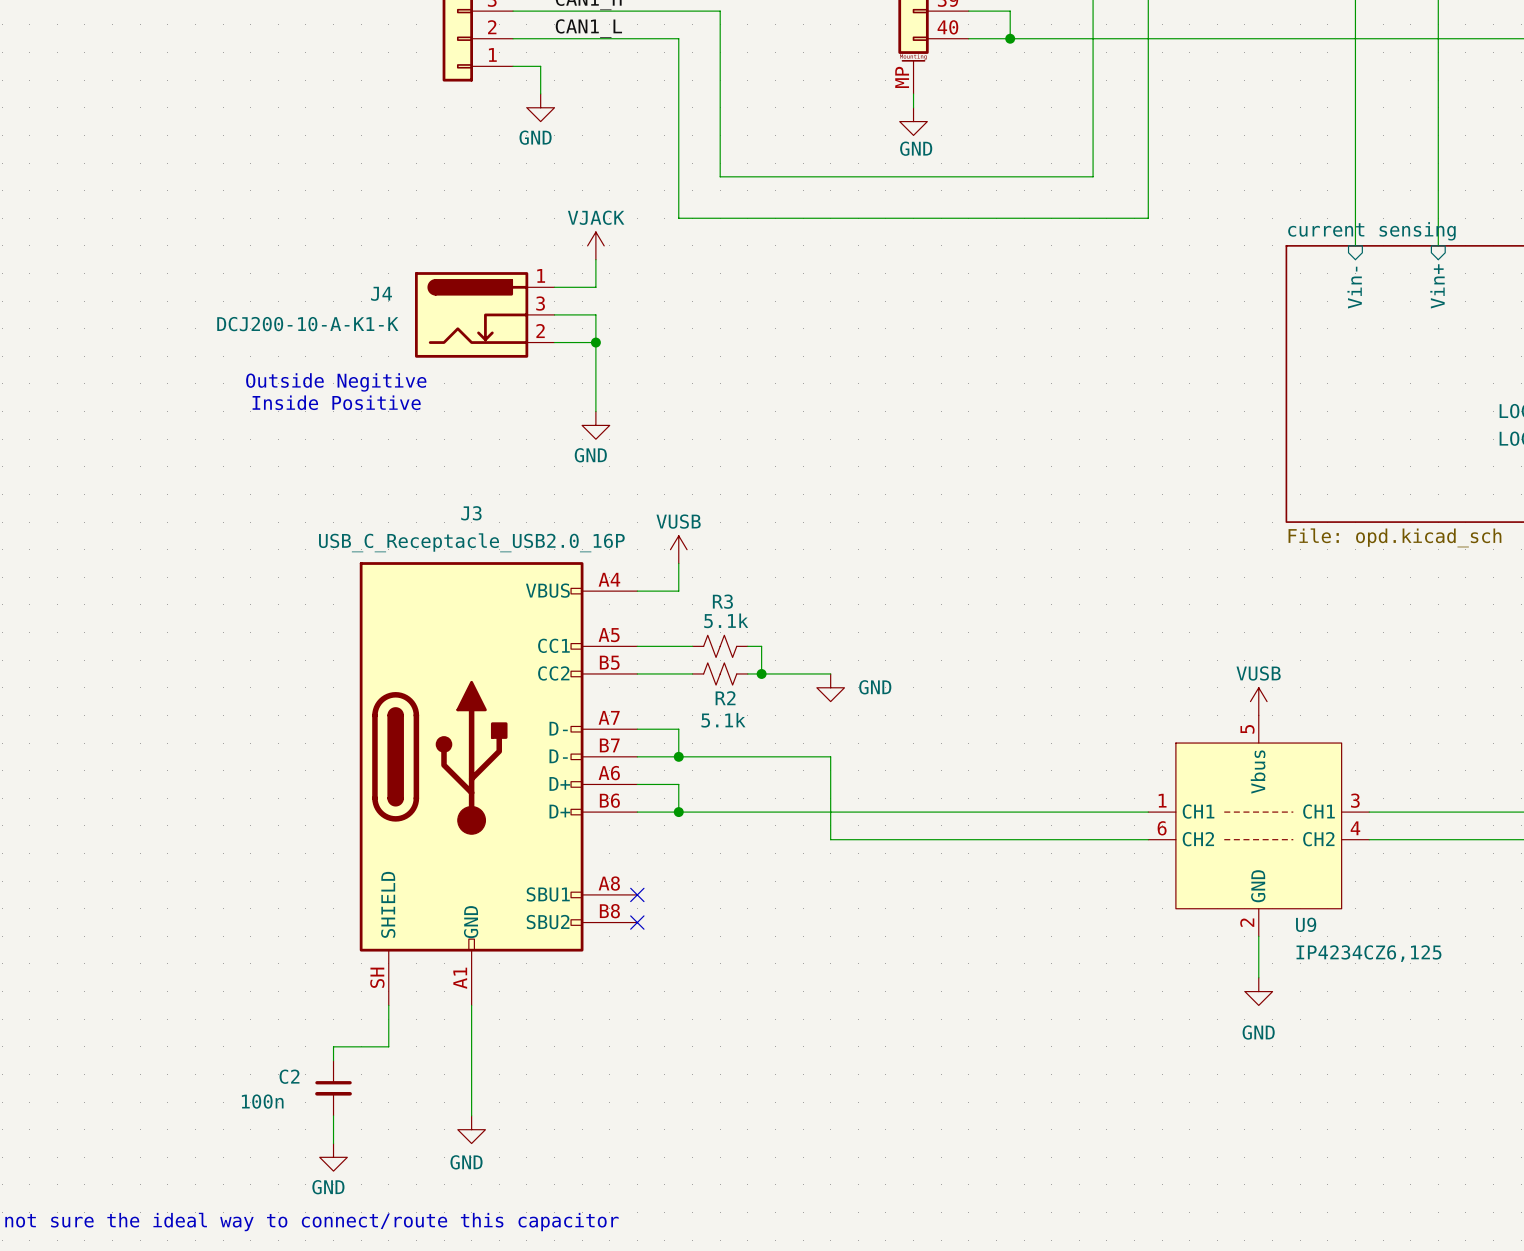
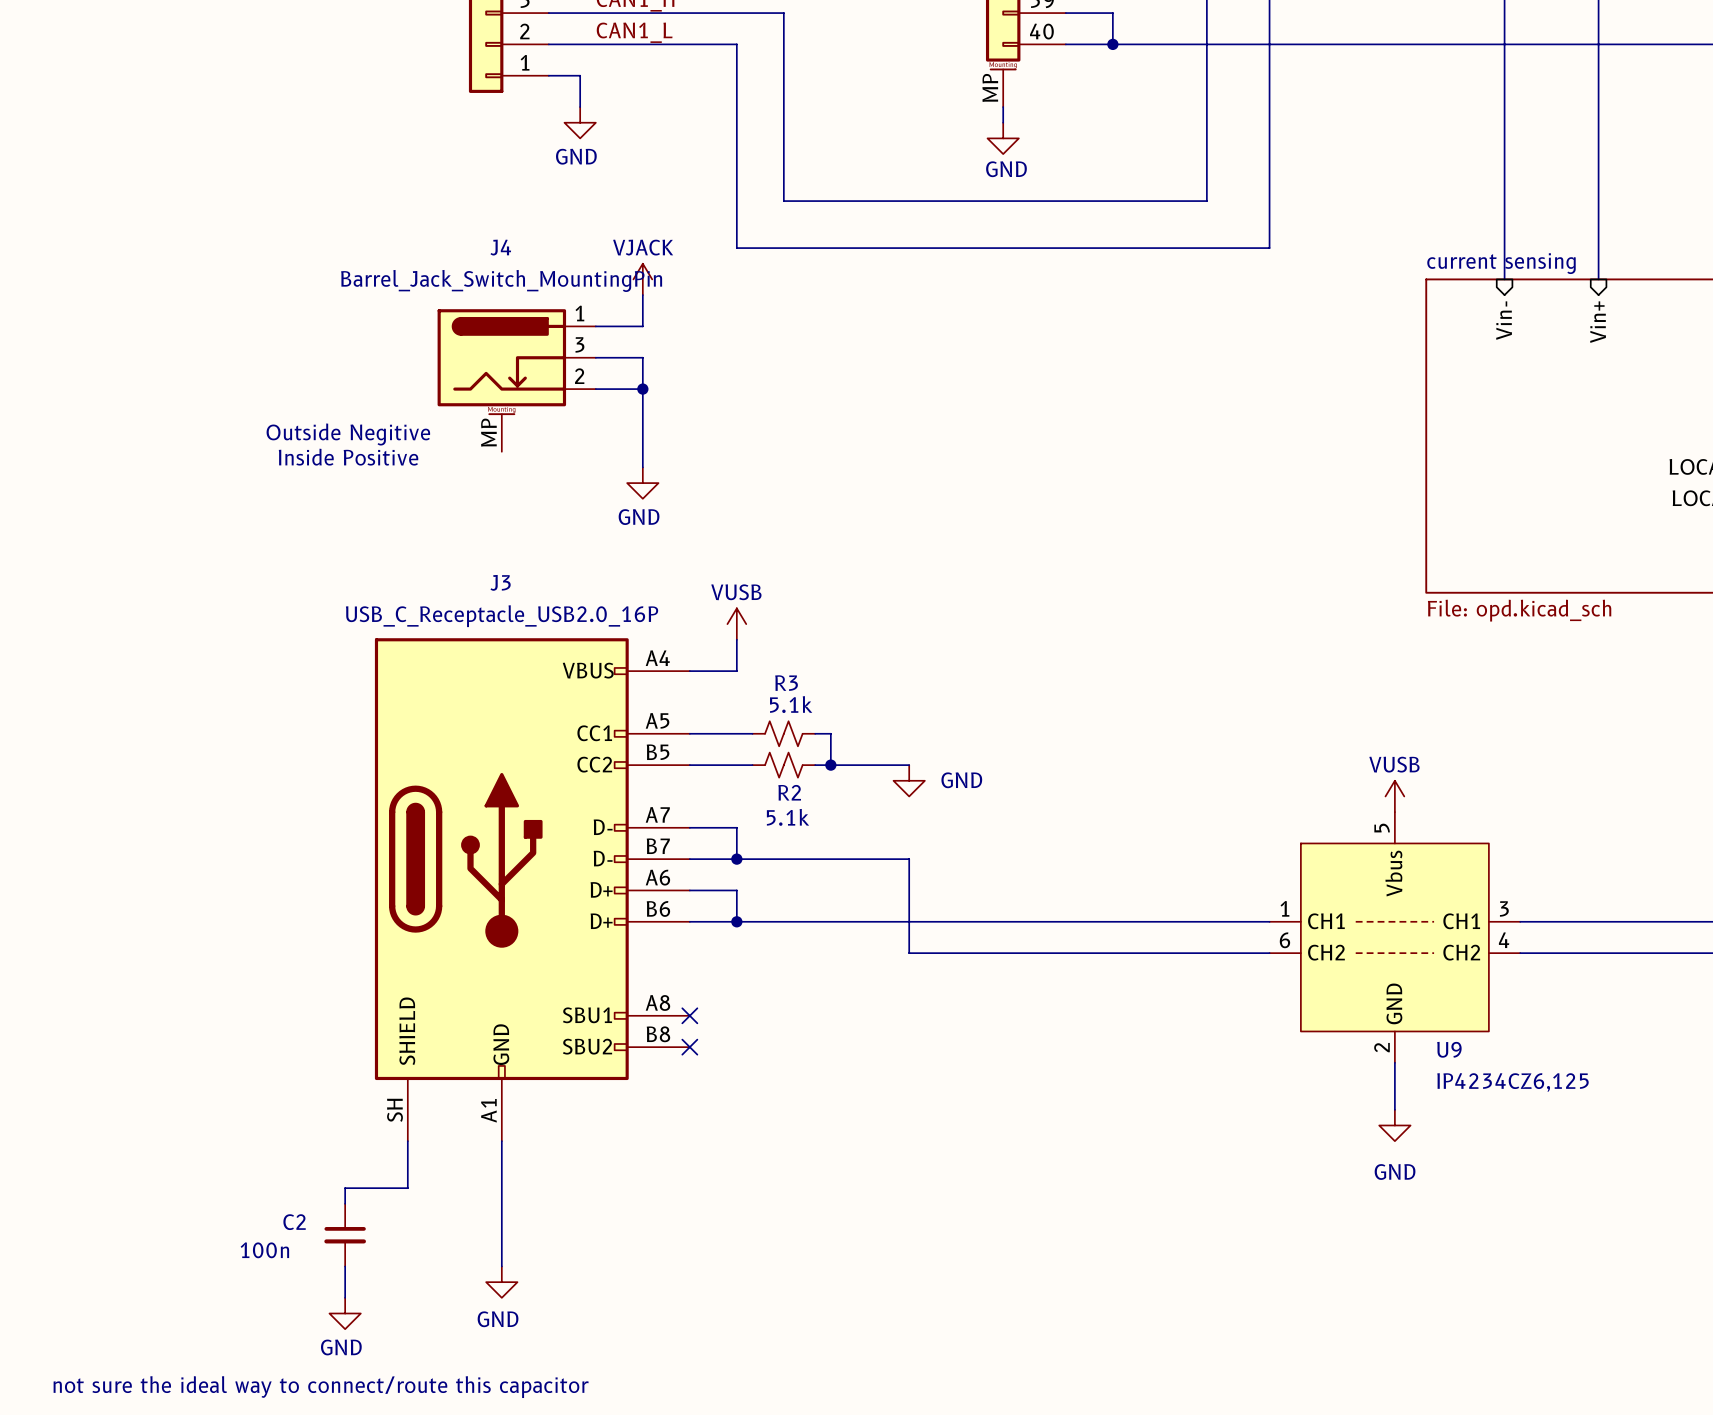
J4 symbol: [415, 272, 555, 358] -> [437, 309, 596, 452]
J4 name position: J4 (381, 293) -> J4 (500, 247)
J4 value: DCJ200-10-A-K1-K (307, 324) -> Barrel_Jack_Switch_MountingPin (501, 280)

